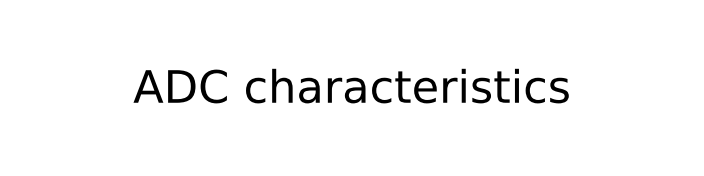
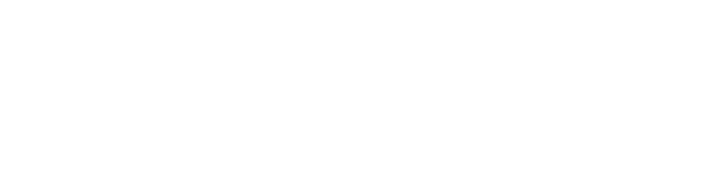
text: ADC characteristics (351, 86) -> none

